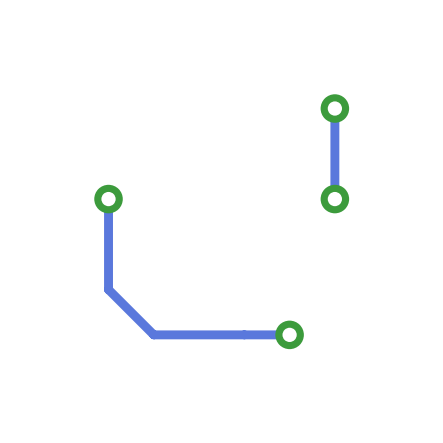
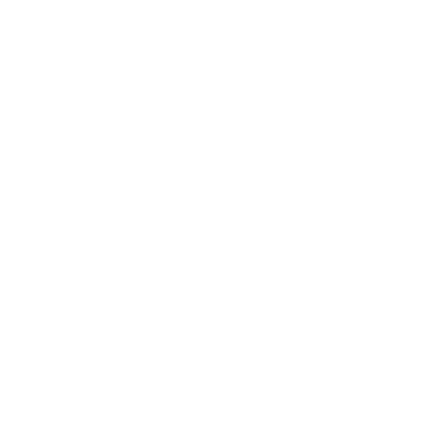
track: (334, 108) (334, 199) -> none
via: (334, 108) -> none
track: (108, 199) (108, 289) (153, 334) (289, 334) -> none
via: (108, 199) -> none
via: (334, 199) -> none
via: (289, 334) -> none

